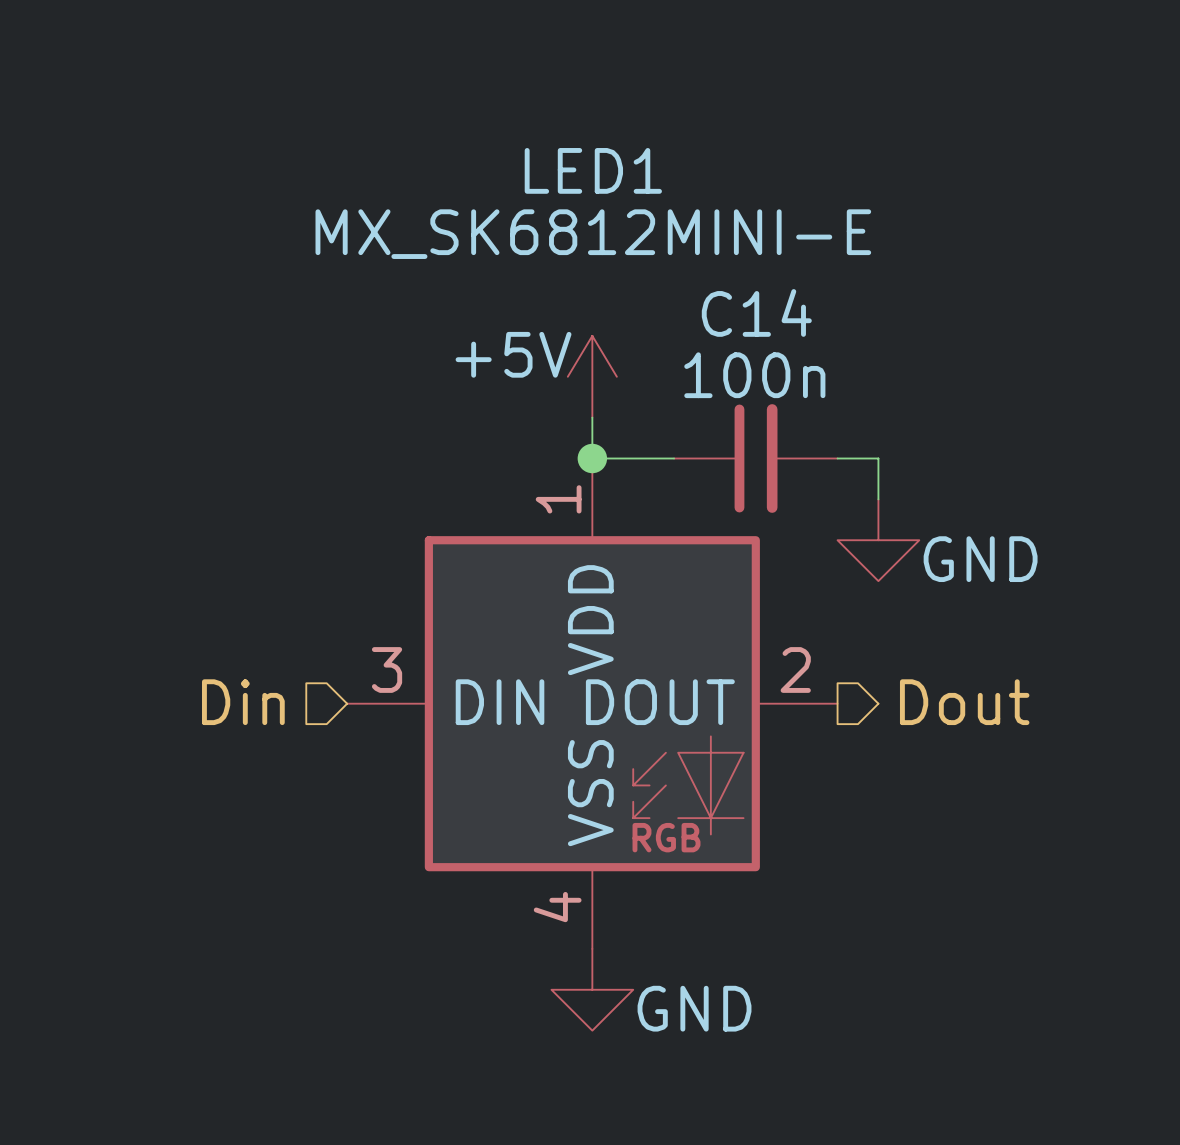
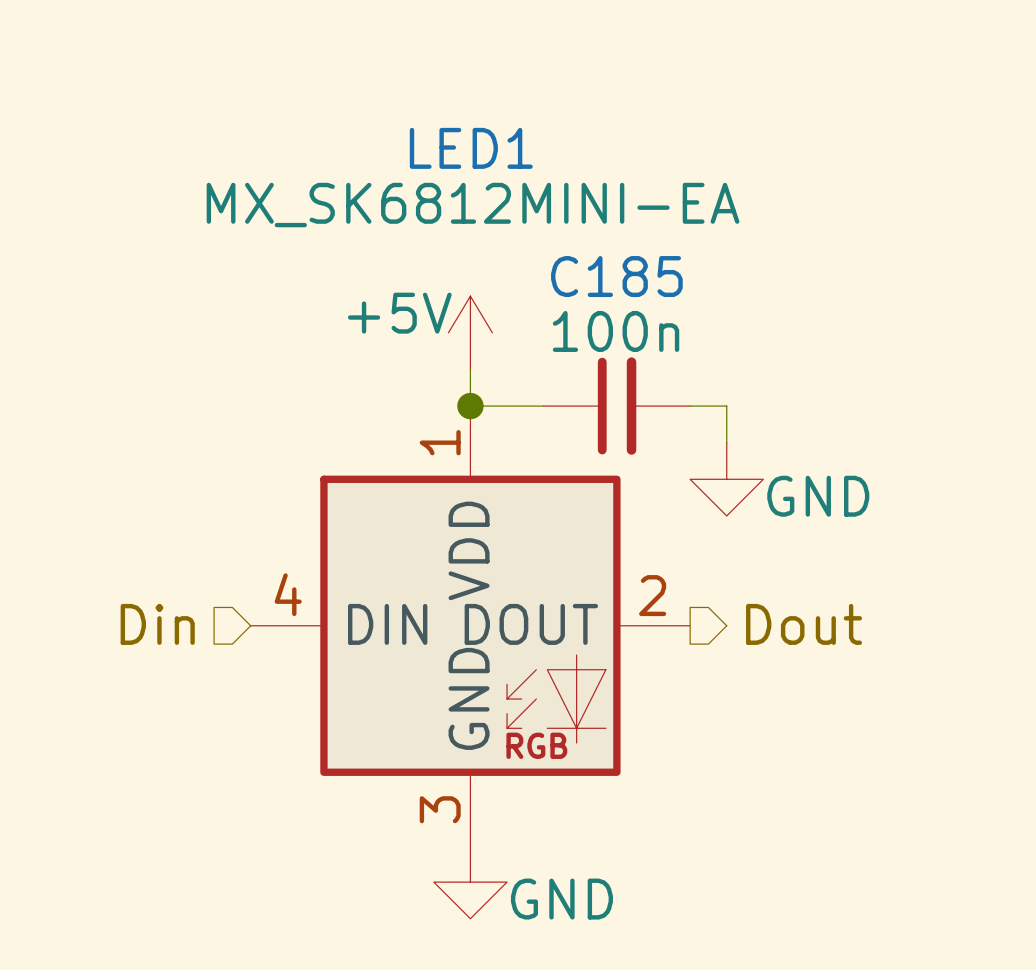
LED1 value: MX_SK6812MINI-E (593, 234) -> MX_SK6812MINI-EA (473, 205)
C14 name: C14 (756, 312) -> C185 (616, 276)
LED1 pin number: 3 (387, 669) -> 4 (288, 594)
LED1 pin name: VSS (590, 793) -> GND (469, 698)
LED1 pin number: 4 (557, 907) -> 3 (440, 809)

